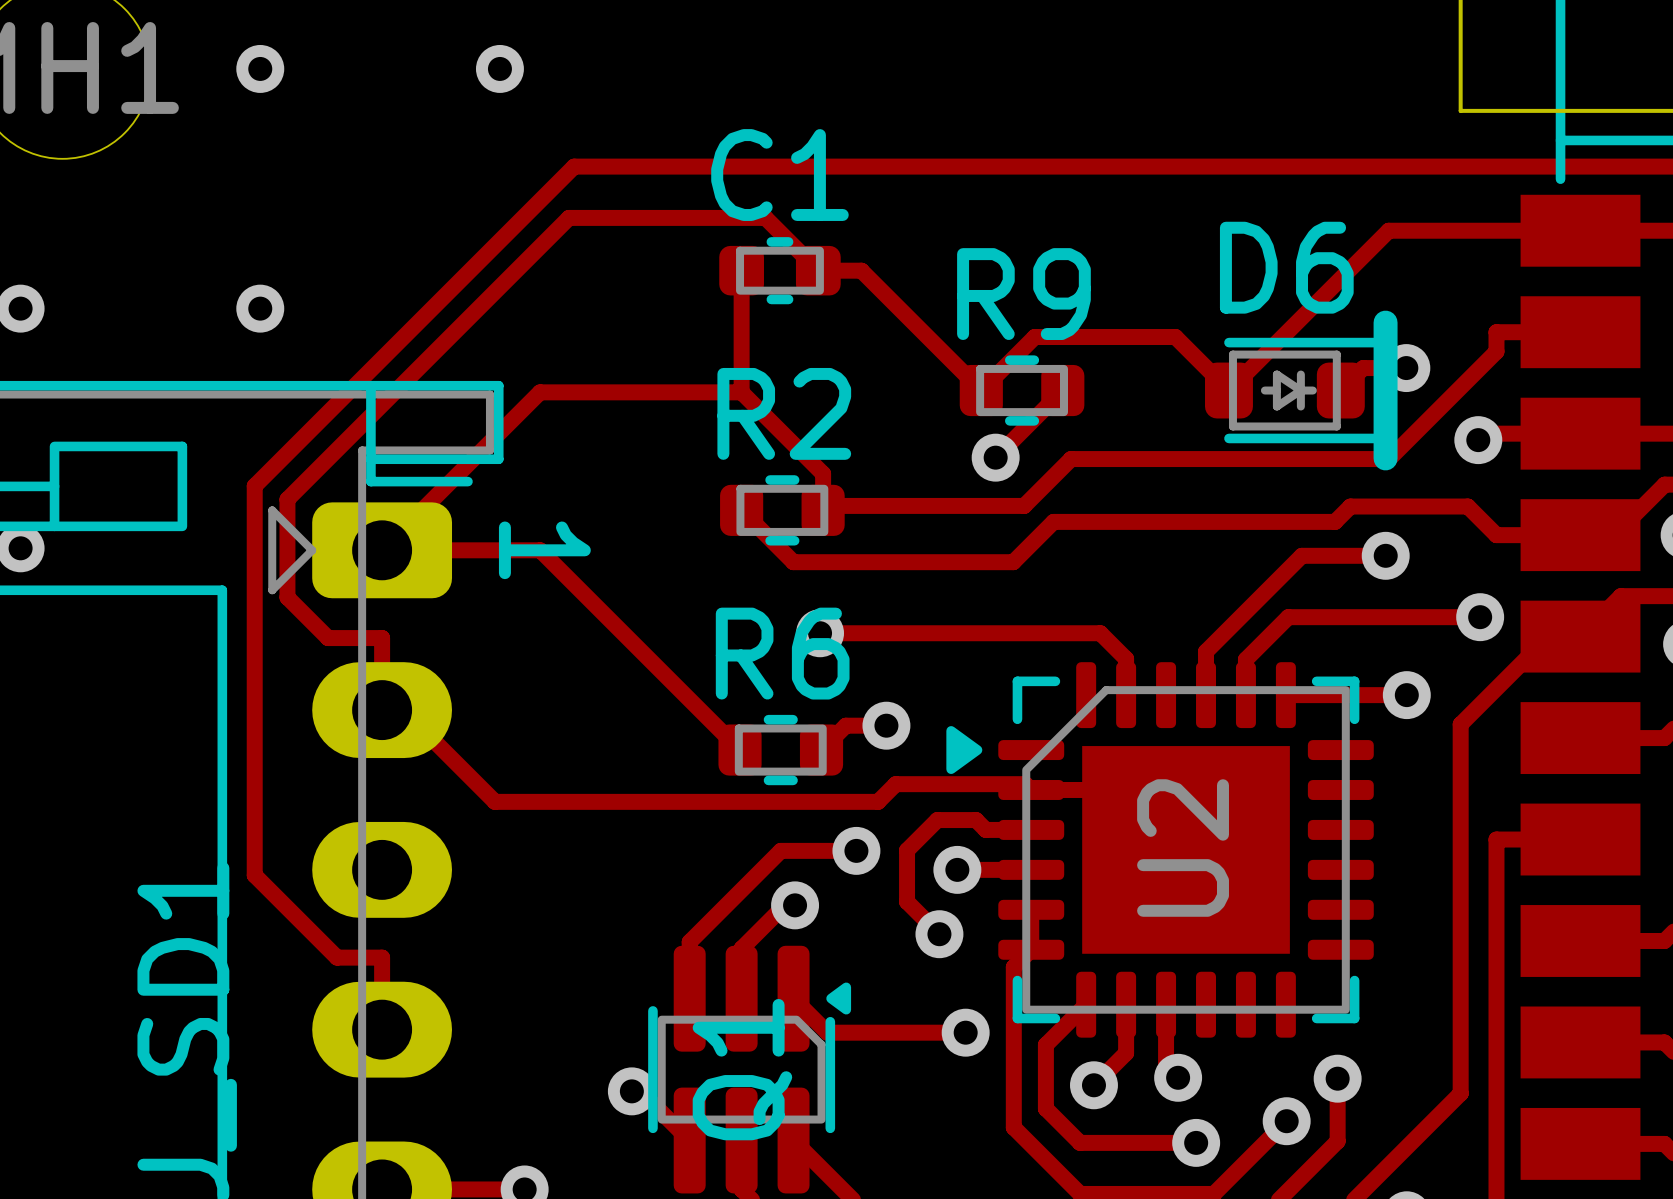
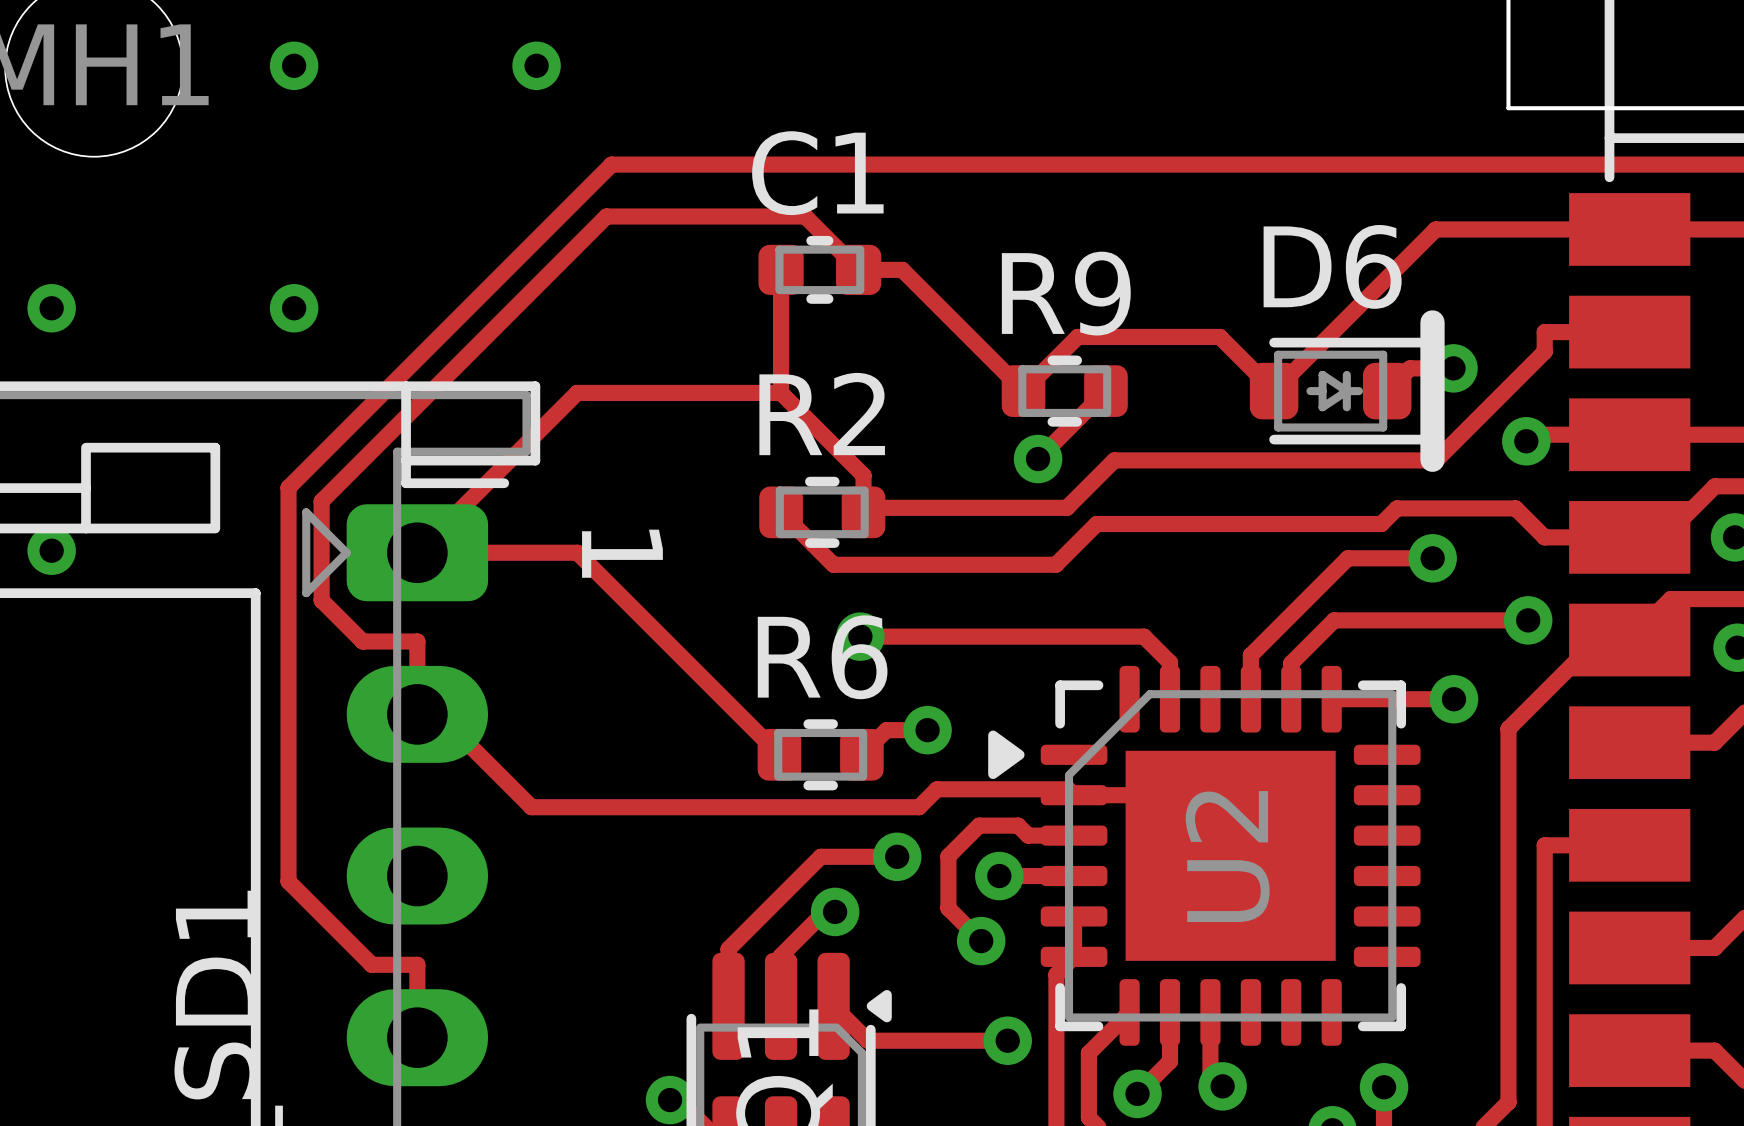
text position: 1 (544, 550) -> 1 (622, 553)

